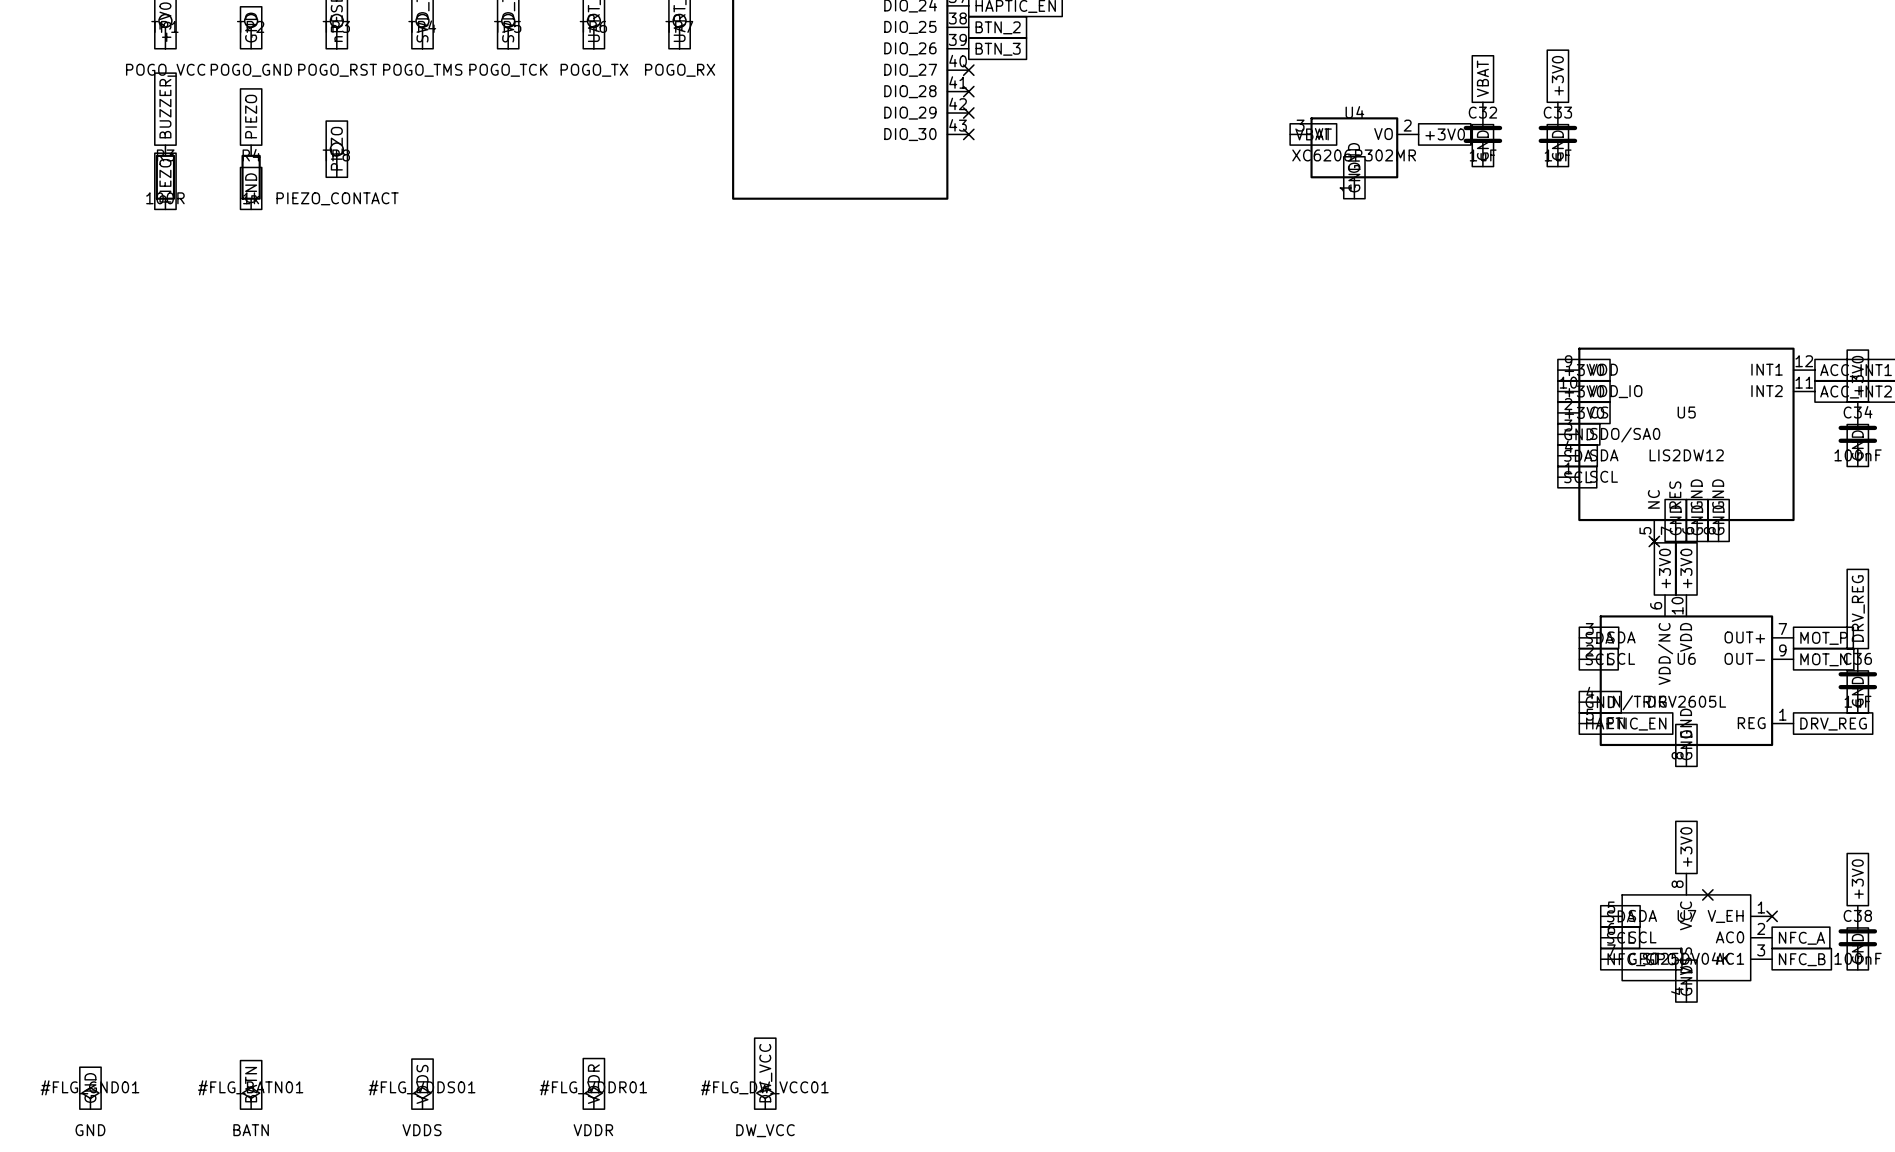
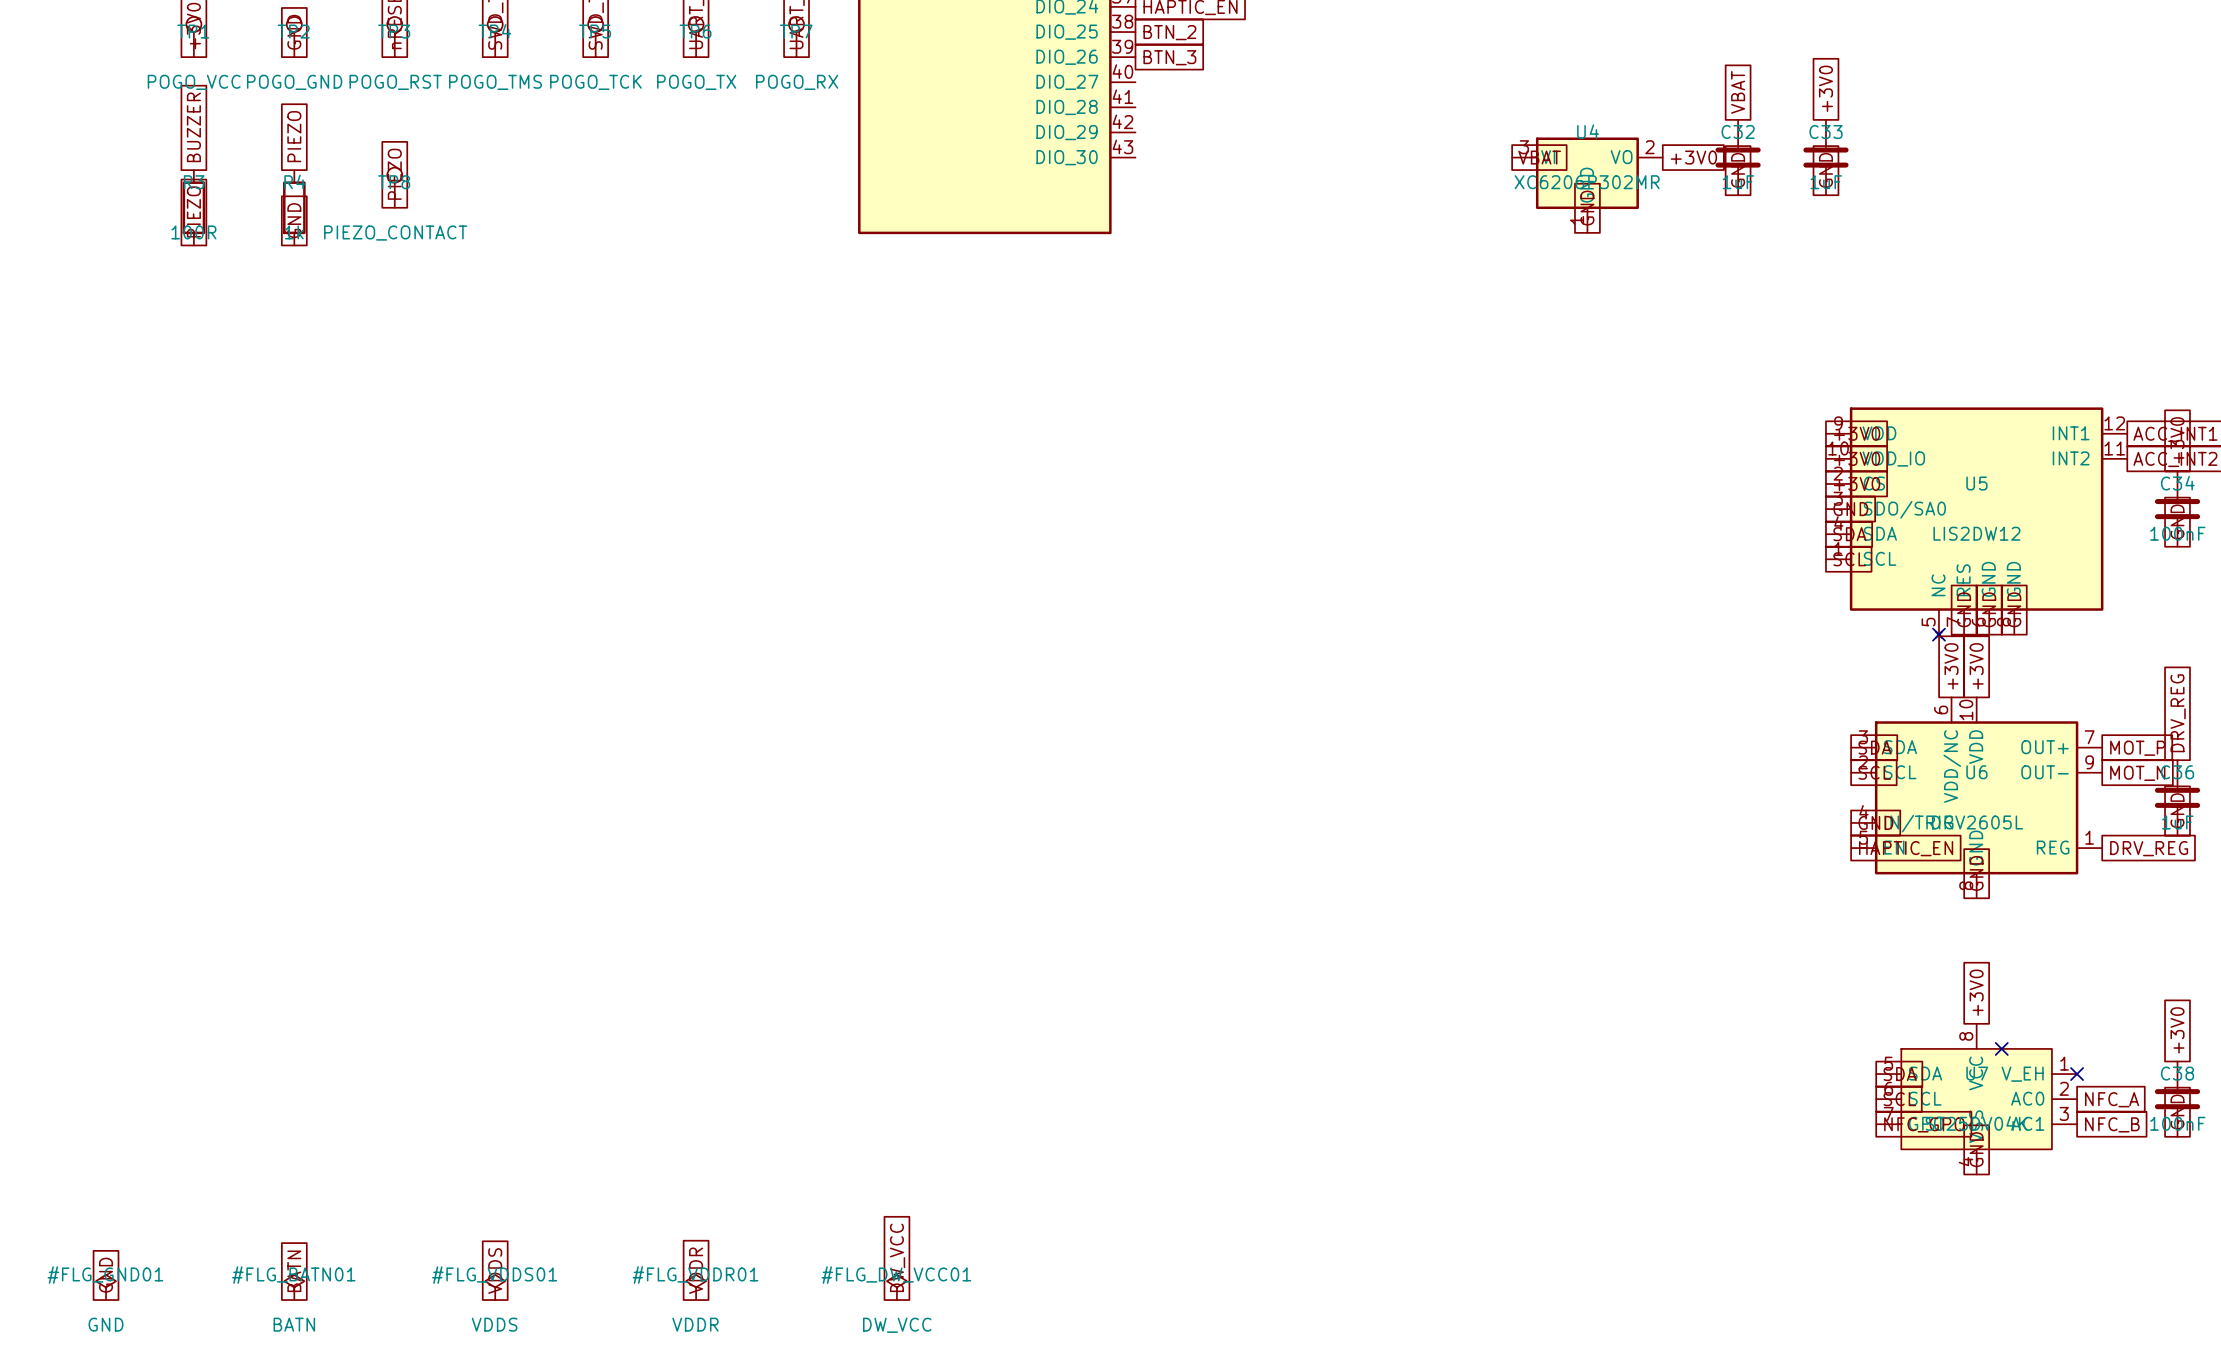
no-connect mark: (968, 70) -> none
no-connect mark: (968, 91) -> none
no-connect mark: (968, 113) -> none
no-connect mark: (968, 134) -> none

